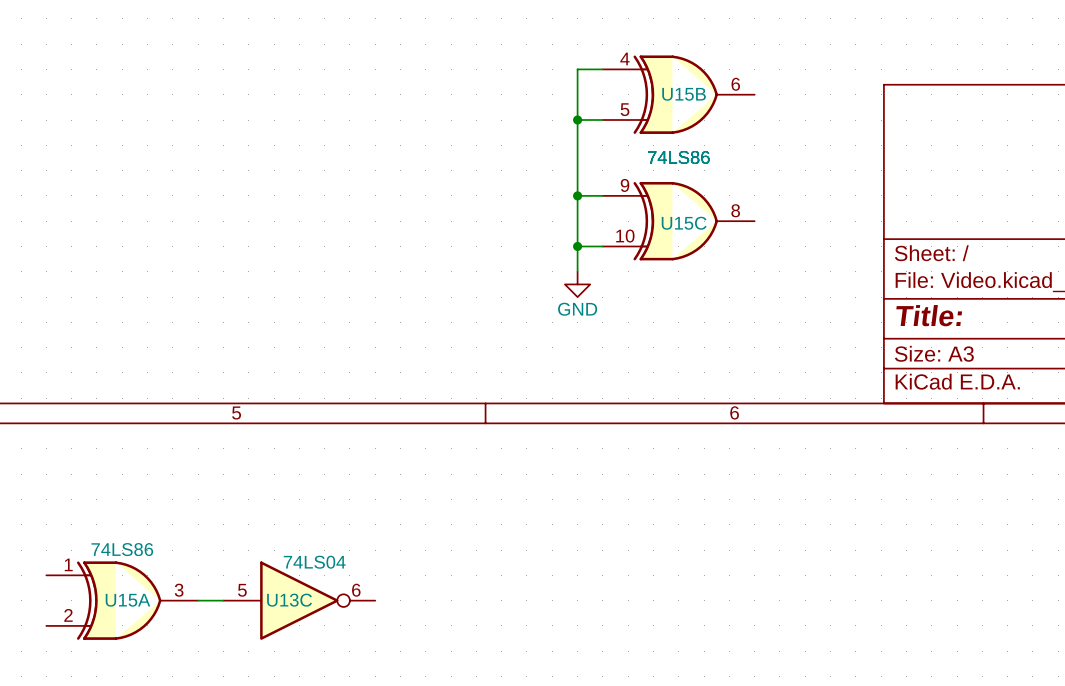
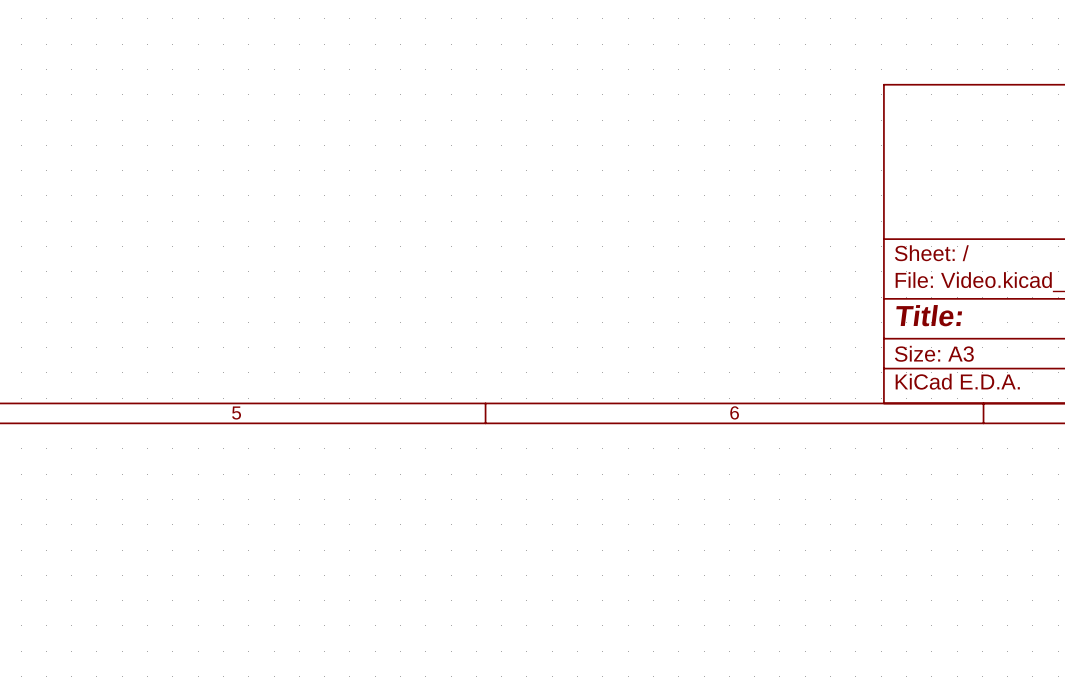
wire: (602, 69) (577, 69) (577, 271) -> none
U15B: 74LS86 (678, 94) -> none
wire: (577, 120) (602, 120) -> none
junction: (577, 120) -> none
wire: (577, 195) (602, 195) -> none
junction: (577, 195) -> none
U15C: 74LS86 (678, 221) -> none
wire: (577, 246) (602, 246) -> none
junction: (577, 246) -> none
power symbol: GND (577, 284) -> none
U15A: 74LS86 (122, 600) -> none
wire: (198, 600) (223, 600) -> none
U13C: 74LS04 (299, 600) -> none

